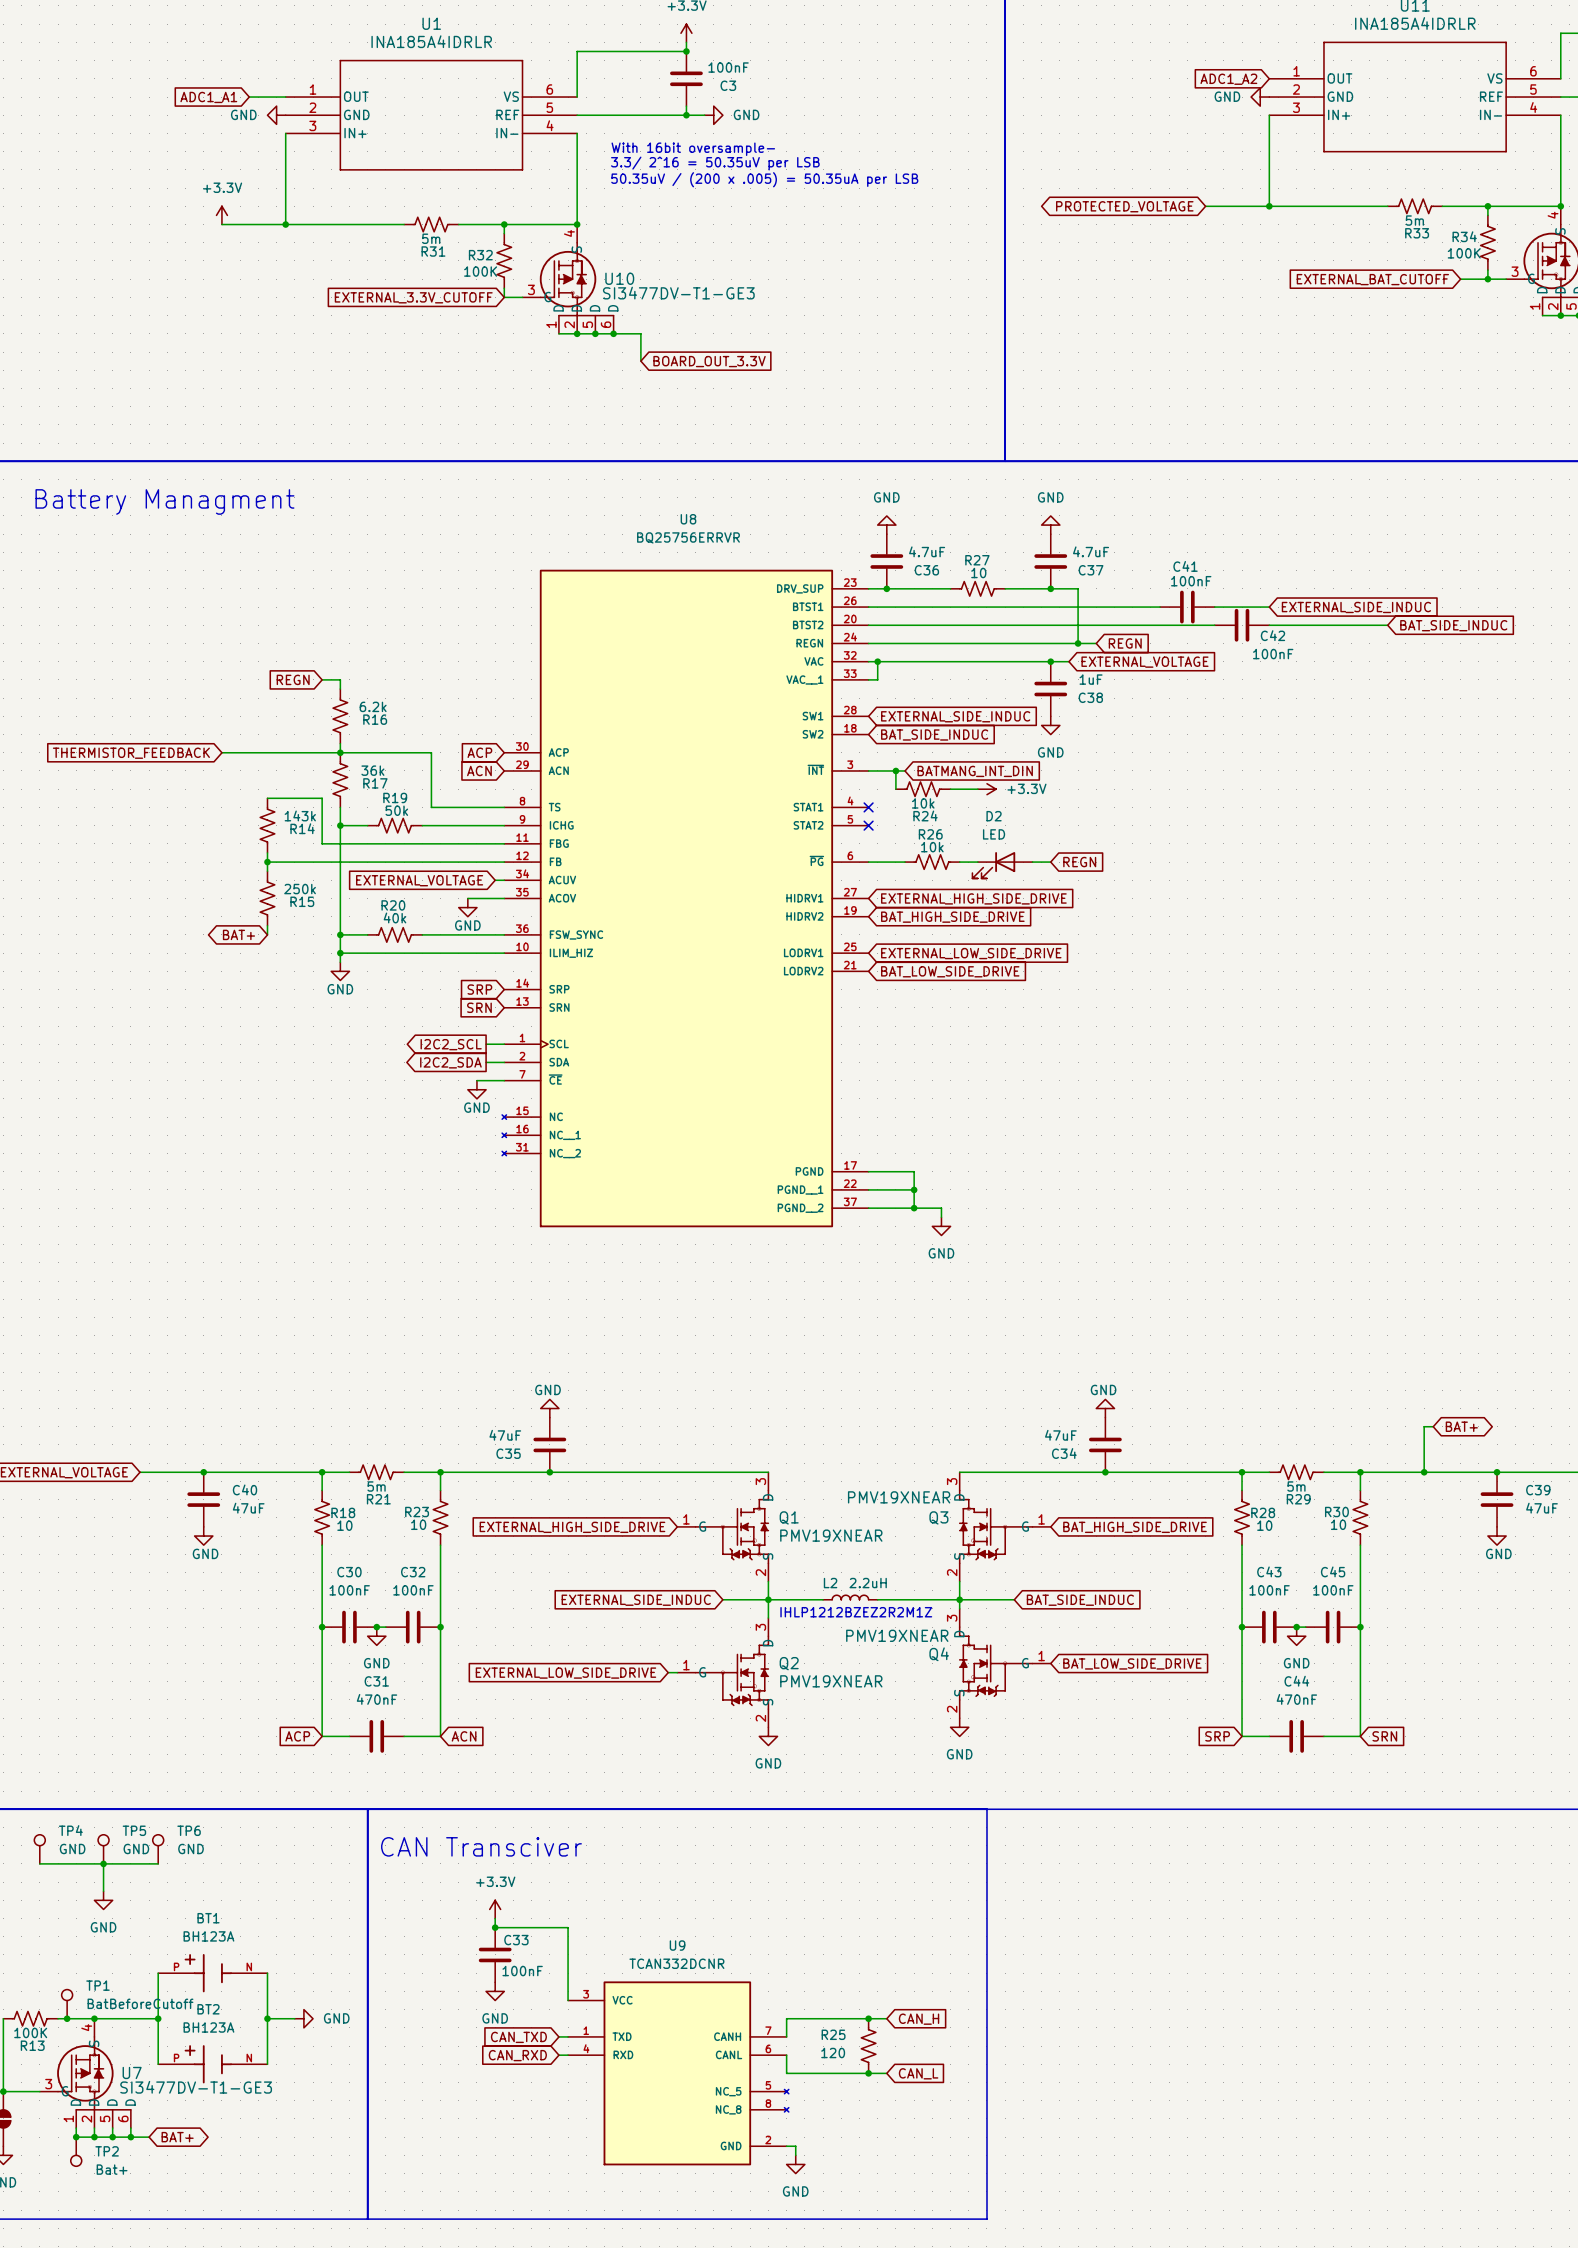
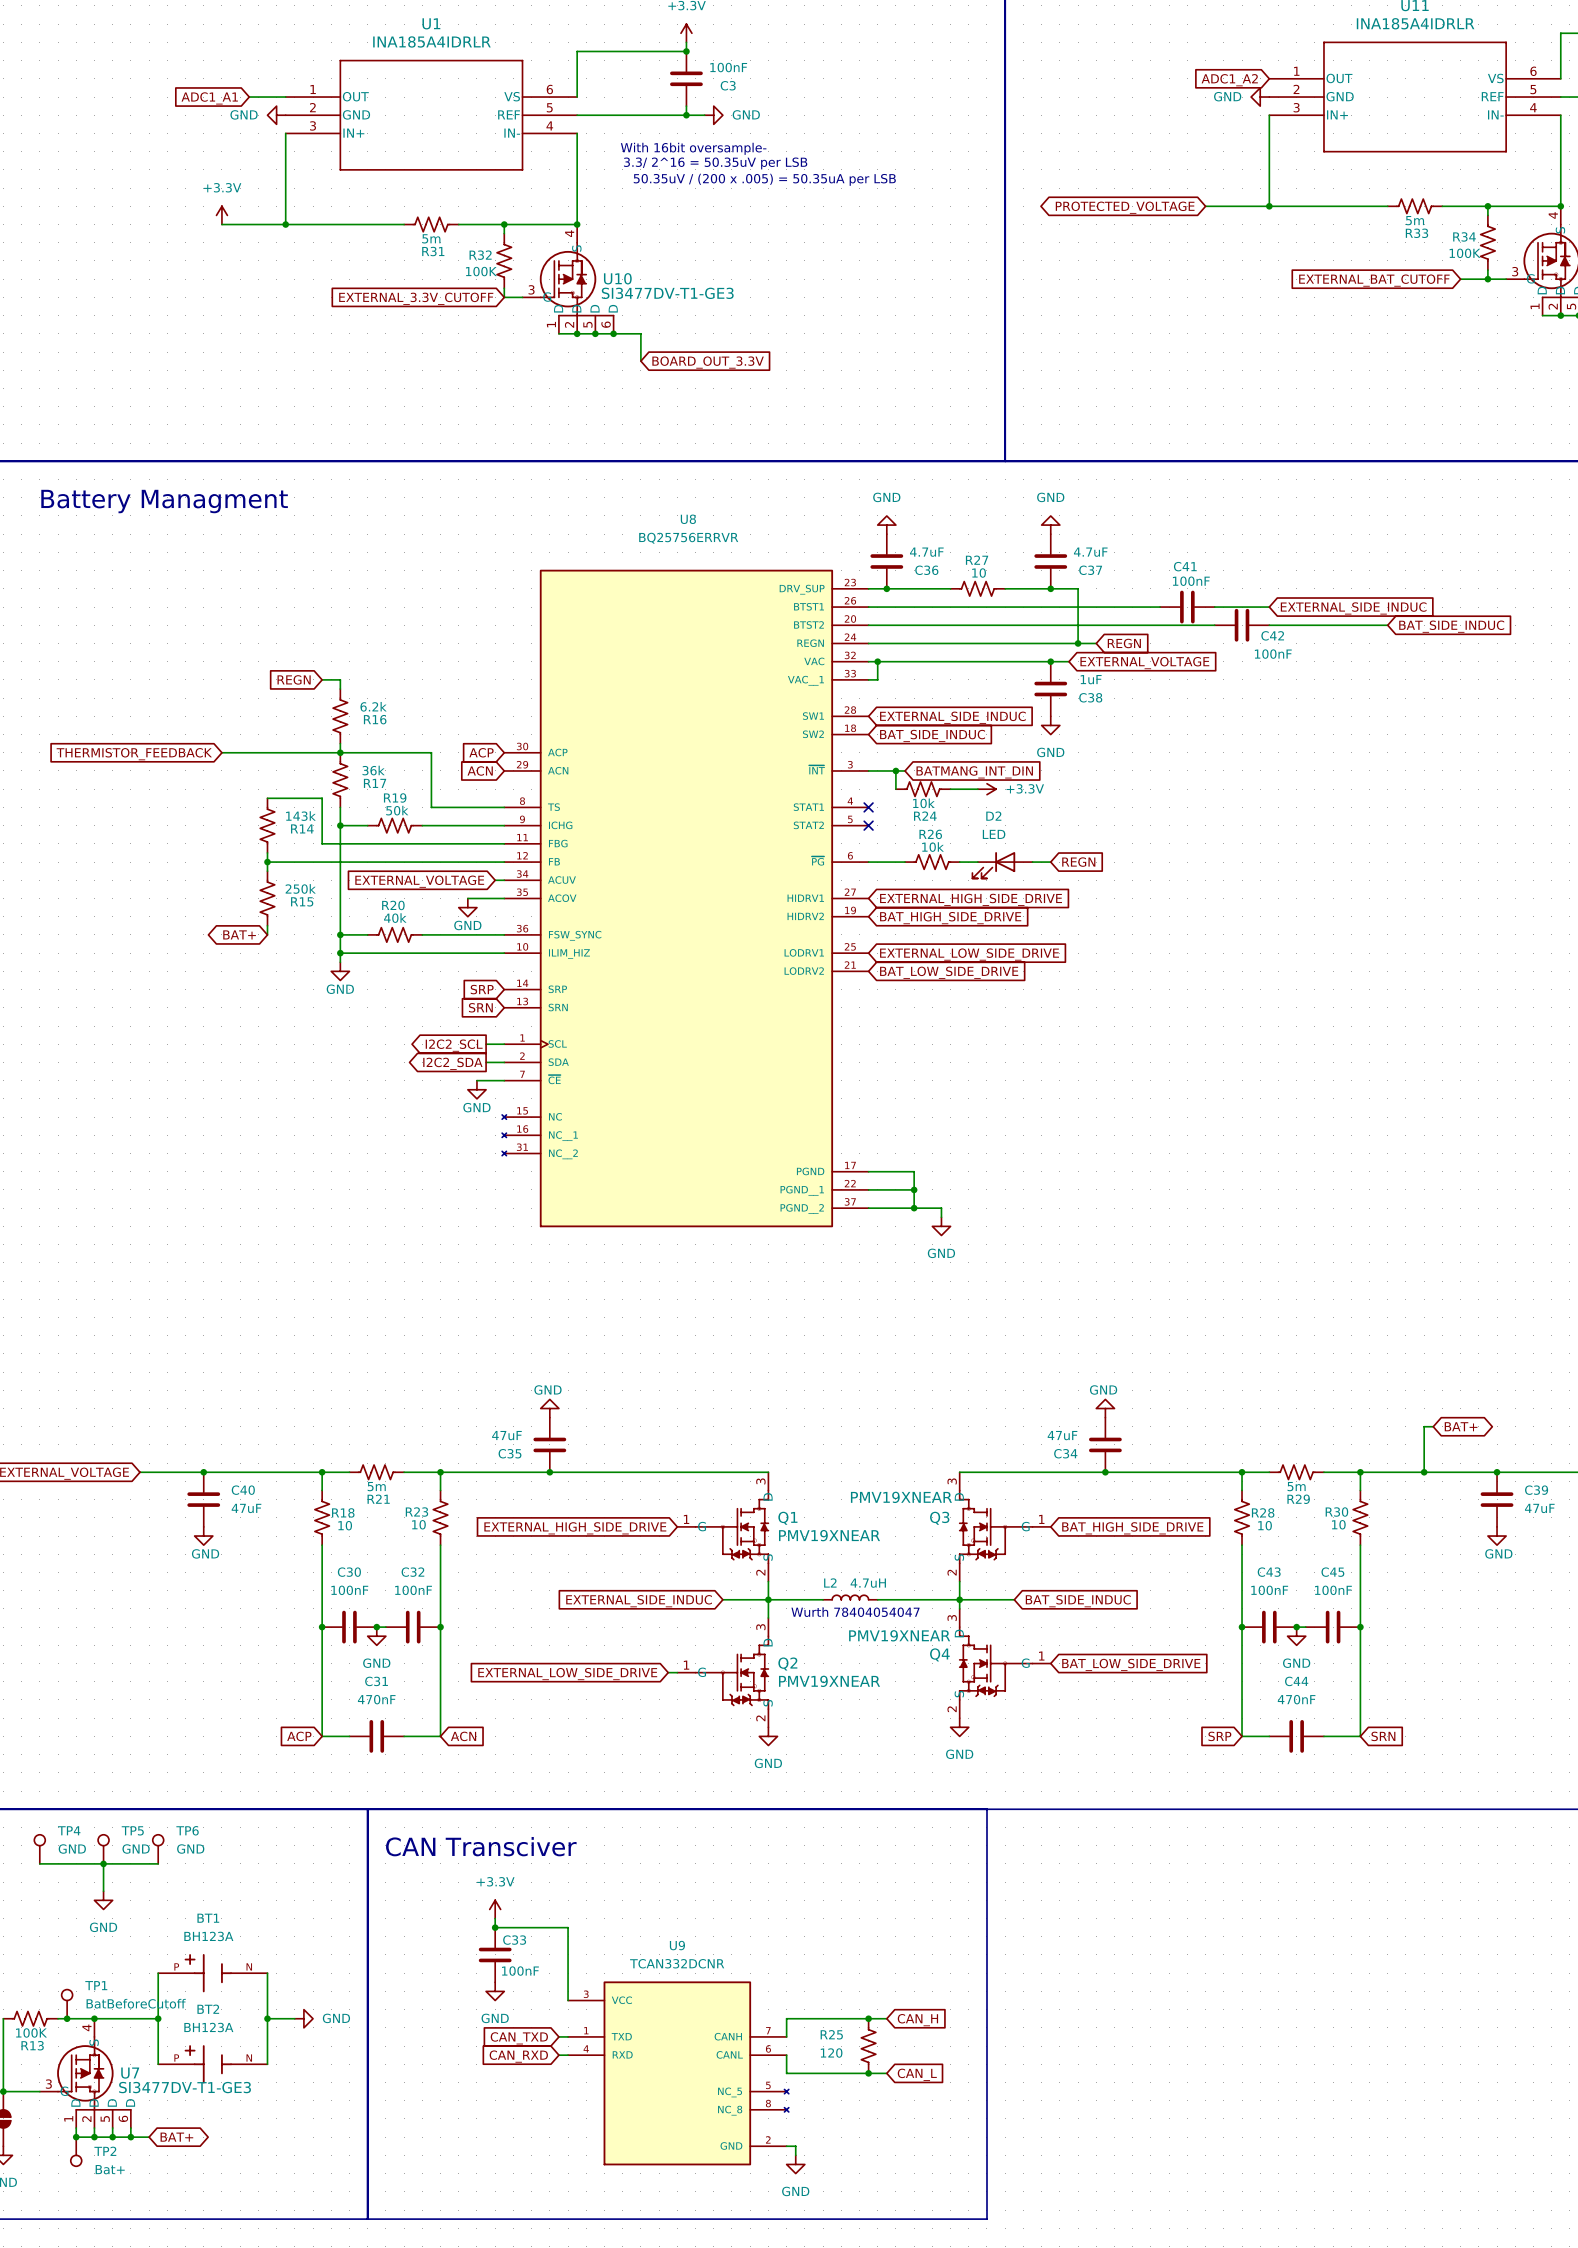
L2 value: 2.2uH (868, 1583) -> 4.7uH (868, 1583)
text: IHLP1212BZEZ2R2M1Z (856, 1612) -> Wurth 78404054047 (855, 1612)

